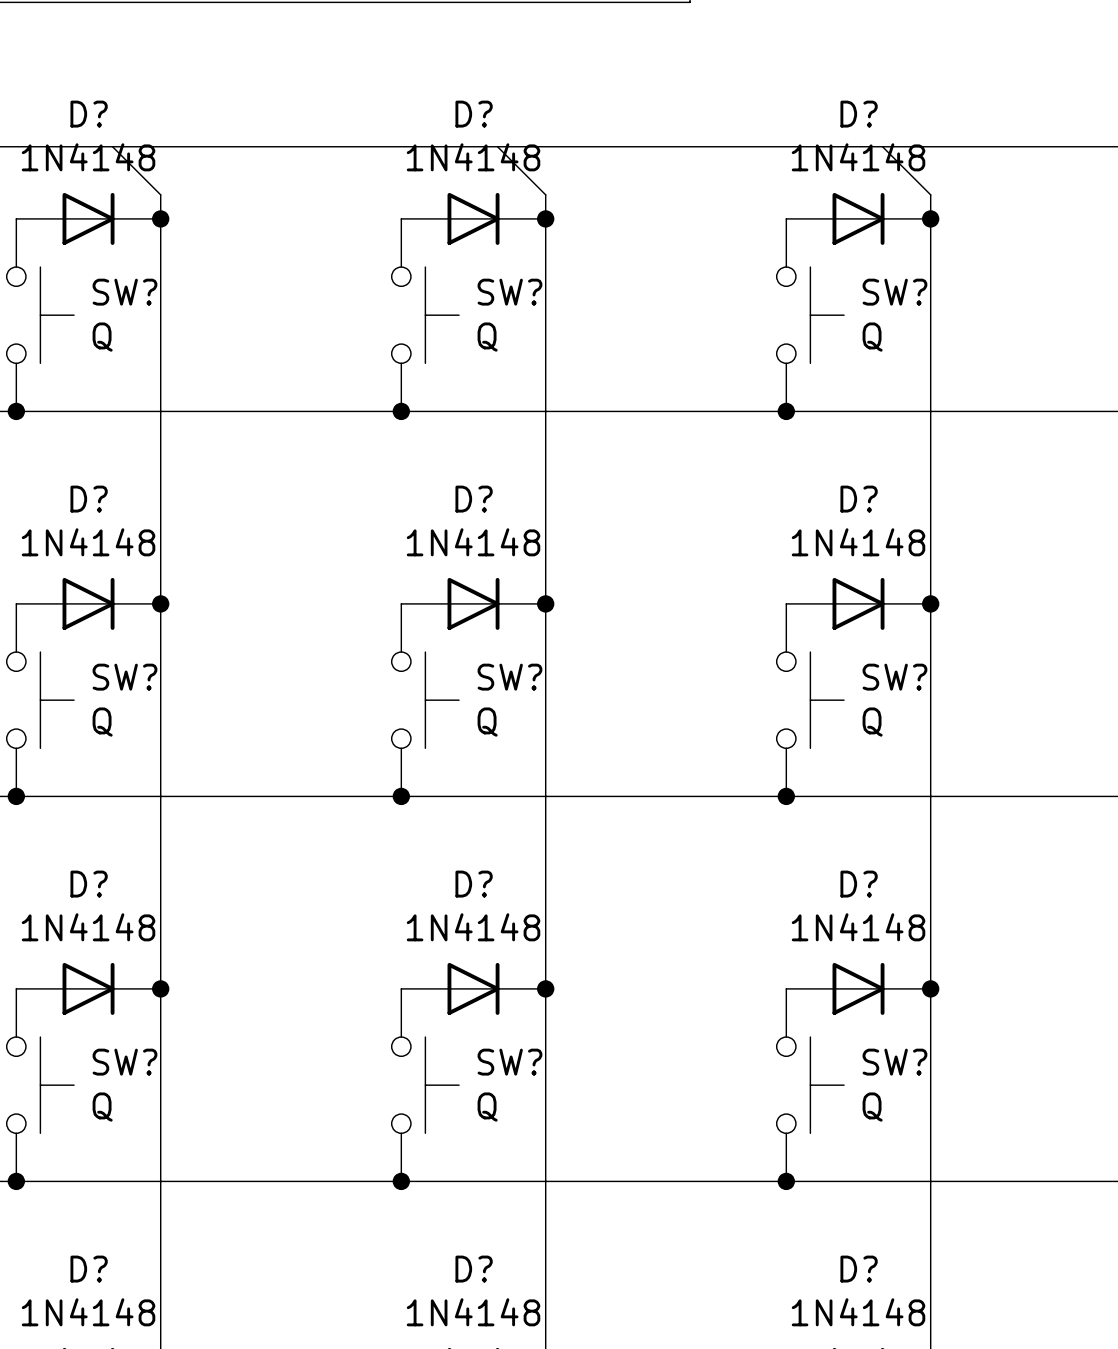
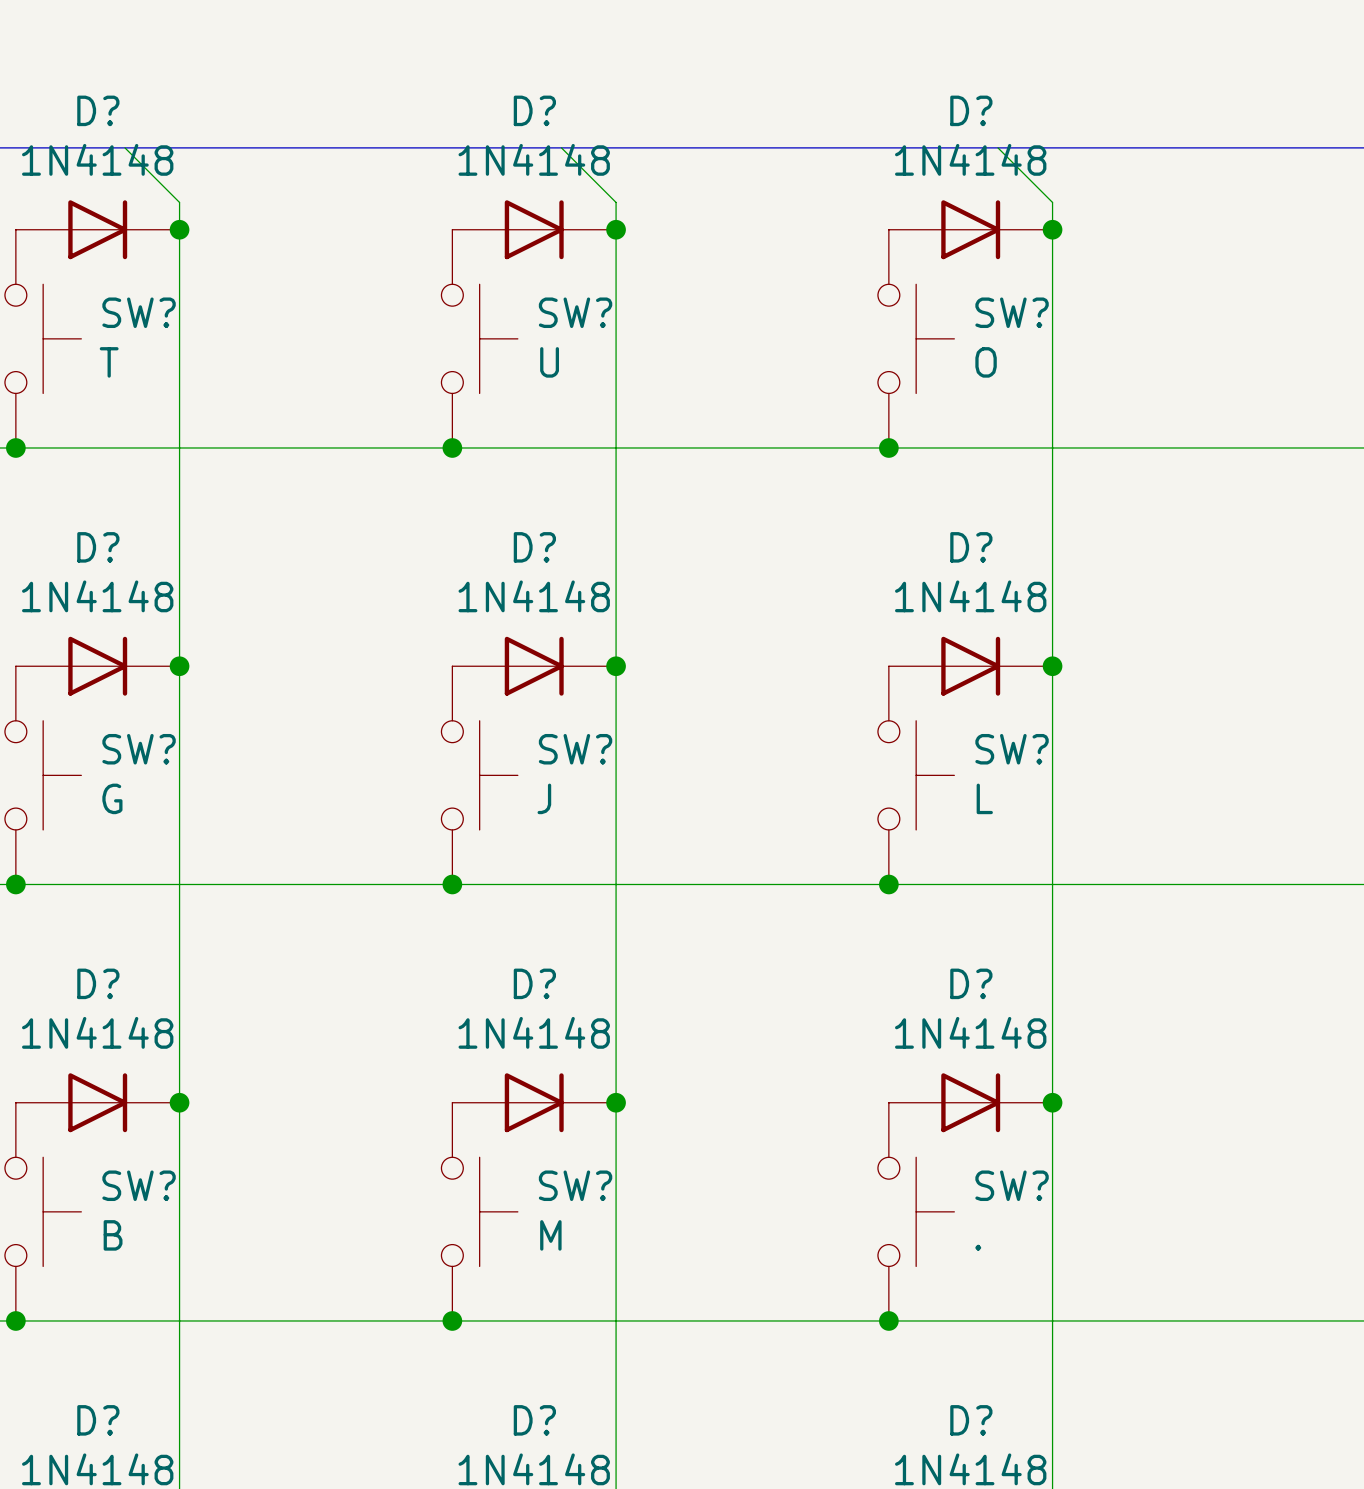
SW? value: Q (102, 337) -> T (109, 362)
SW? value: Q (487, 337) -> U (549, 362)
SW? value: Q (872, 337) -> O (986, 362)
SW? value: Q (102, 722) -> G (112, 798)
SW? value: Q (487, 722) -> J (544, 798)
SW? value: Q (872, 722) -> L (984, 798)
SW? value: Q (102, 1107) -> B (113, 1235)
SW? value: Q (487, 1107) -> M (550, 1235)
SW? value: Q (872, 1107) -> . (978, 1247)

